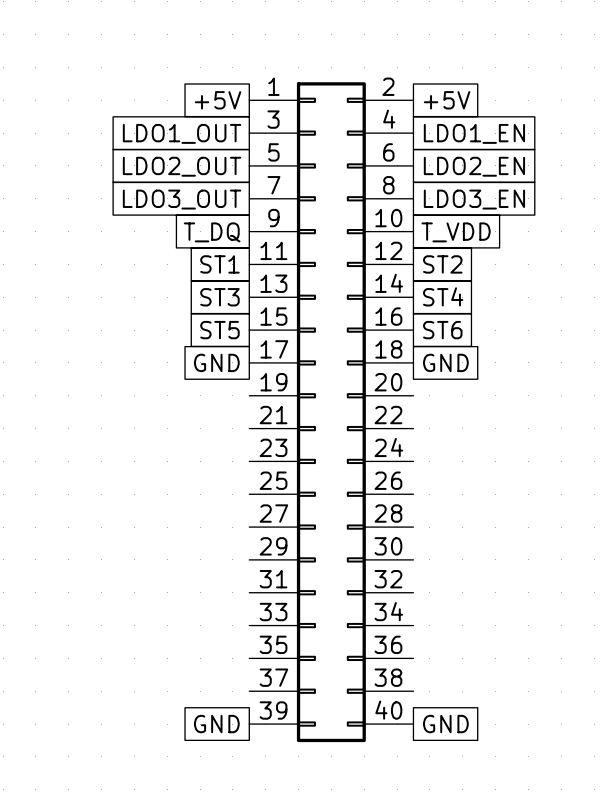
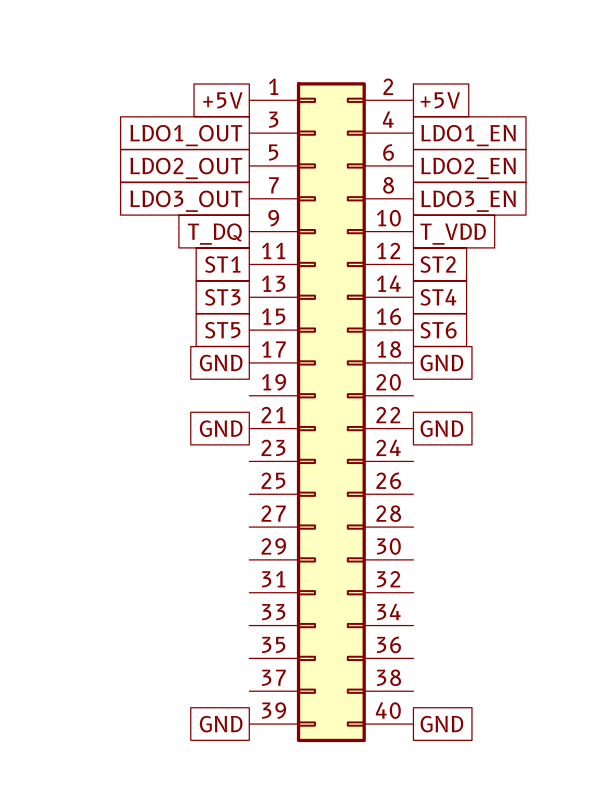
global label: none -> GND (221, 428)
global label: none -> GND (441, 428)

